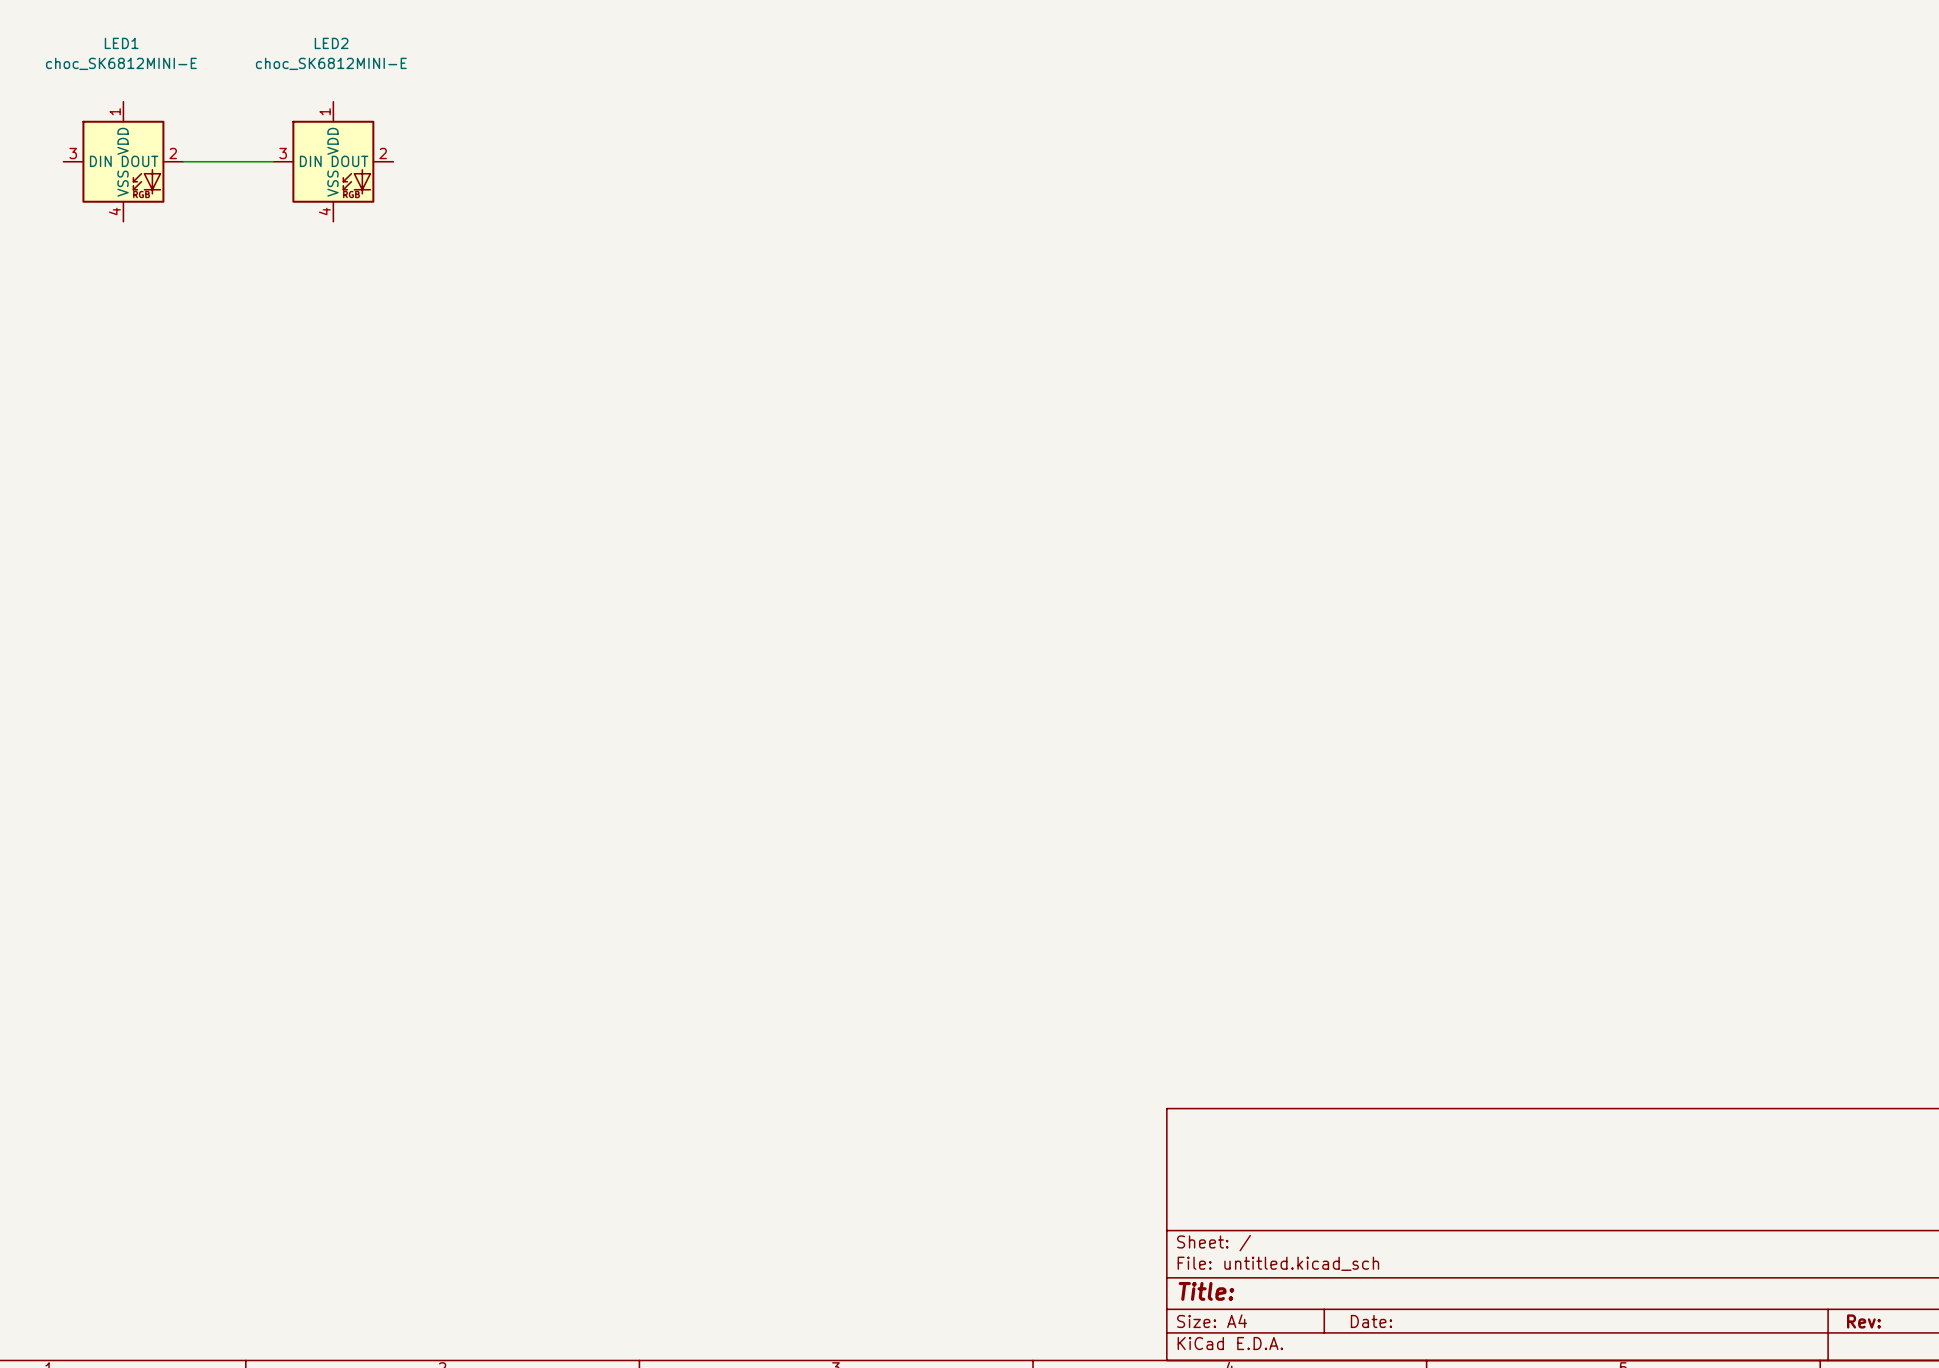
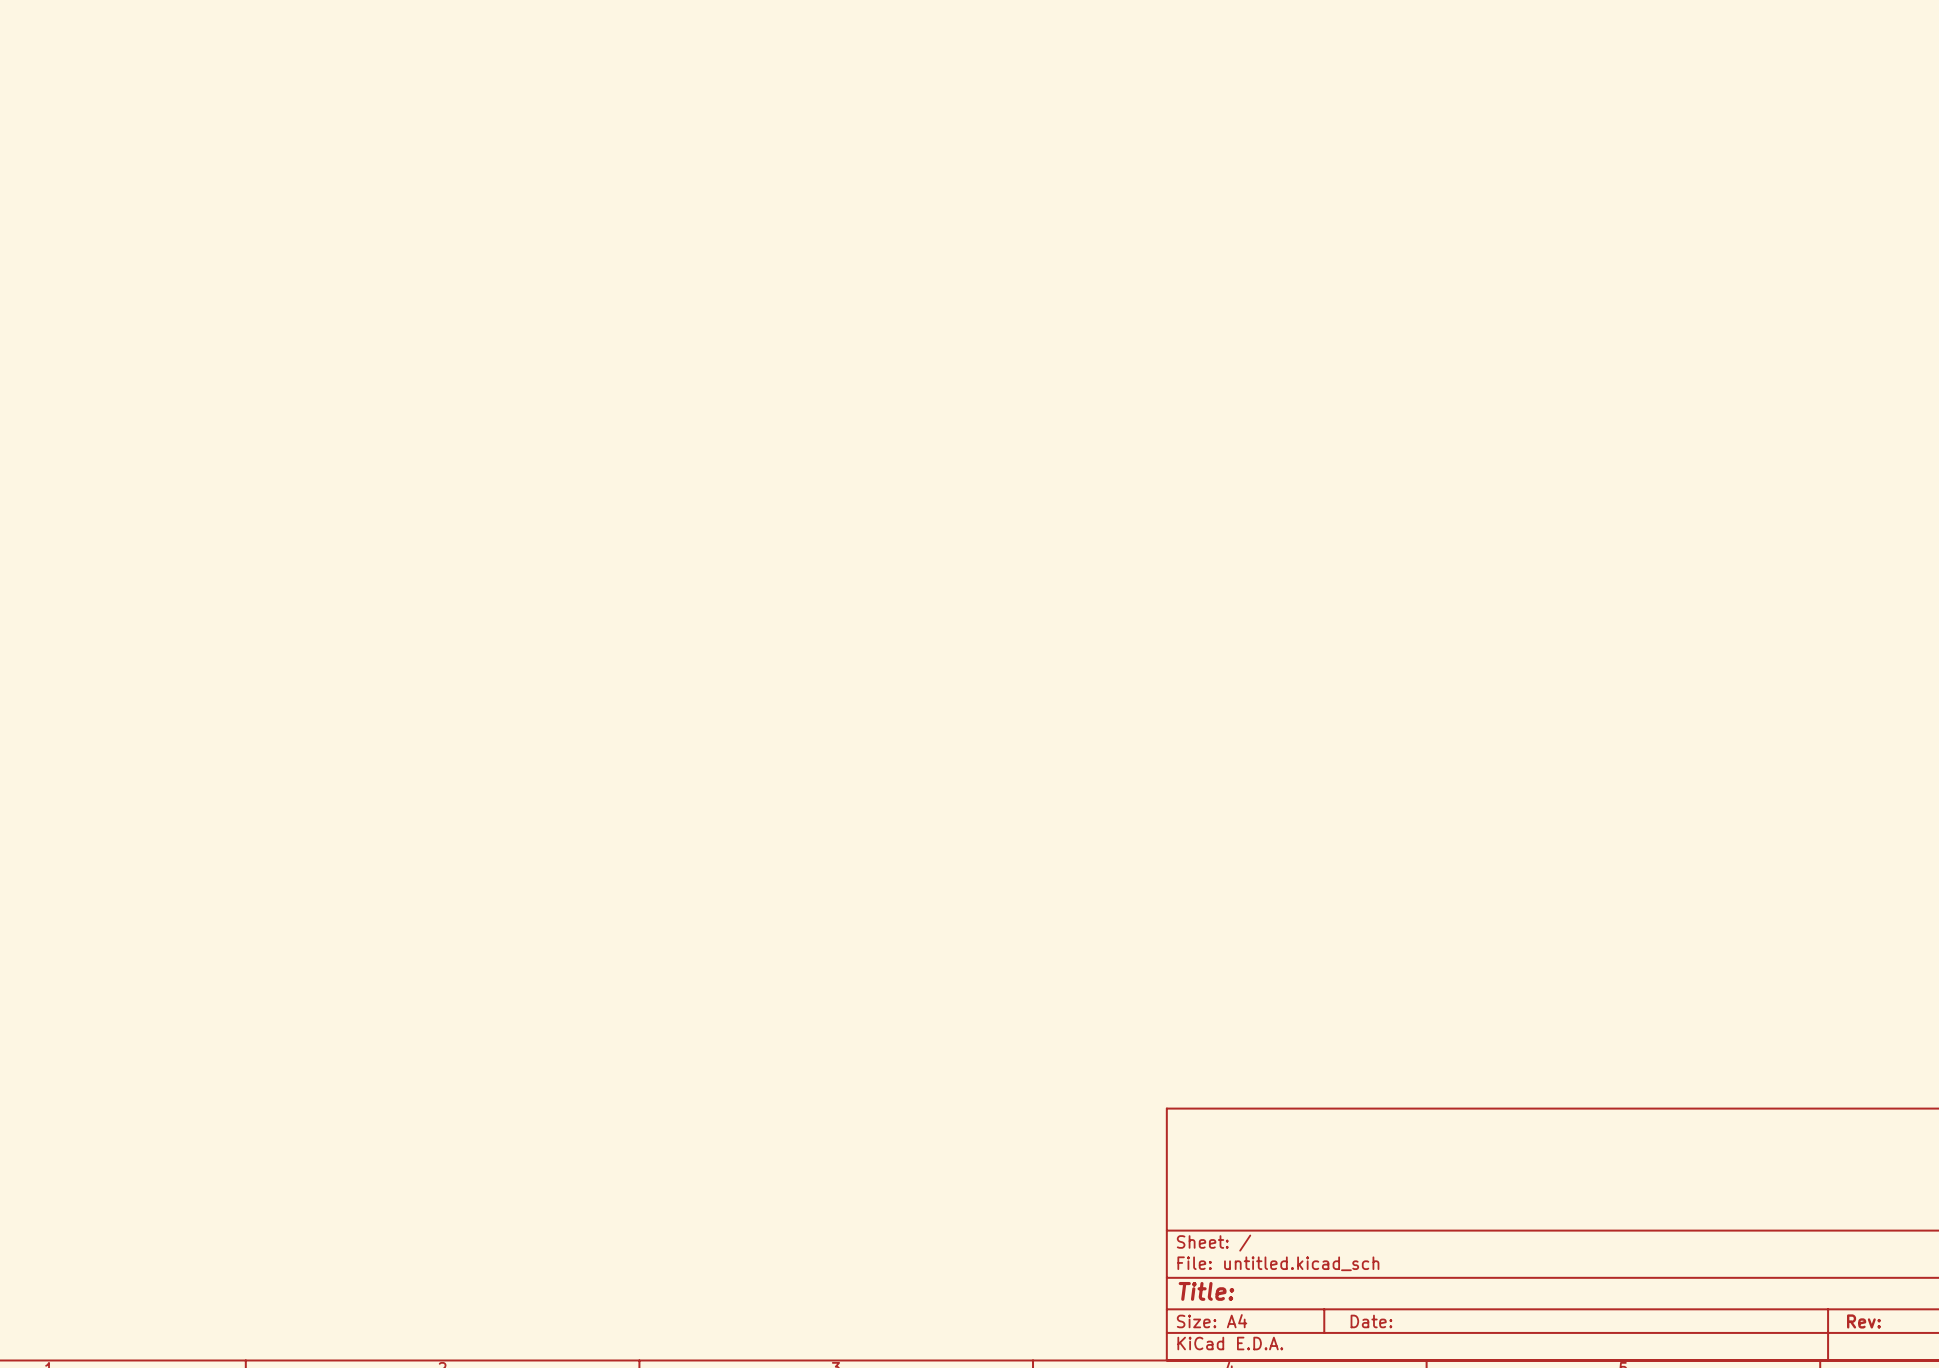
LED1: choc_SK6812MINI-E (123, 161) -> none
wire: (183, 161) (273, 161) -> none
LED2: choc_SK6812MINI-E (333, 161) -> none

